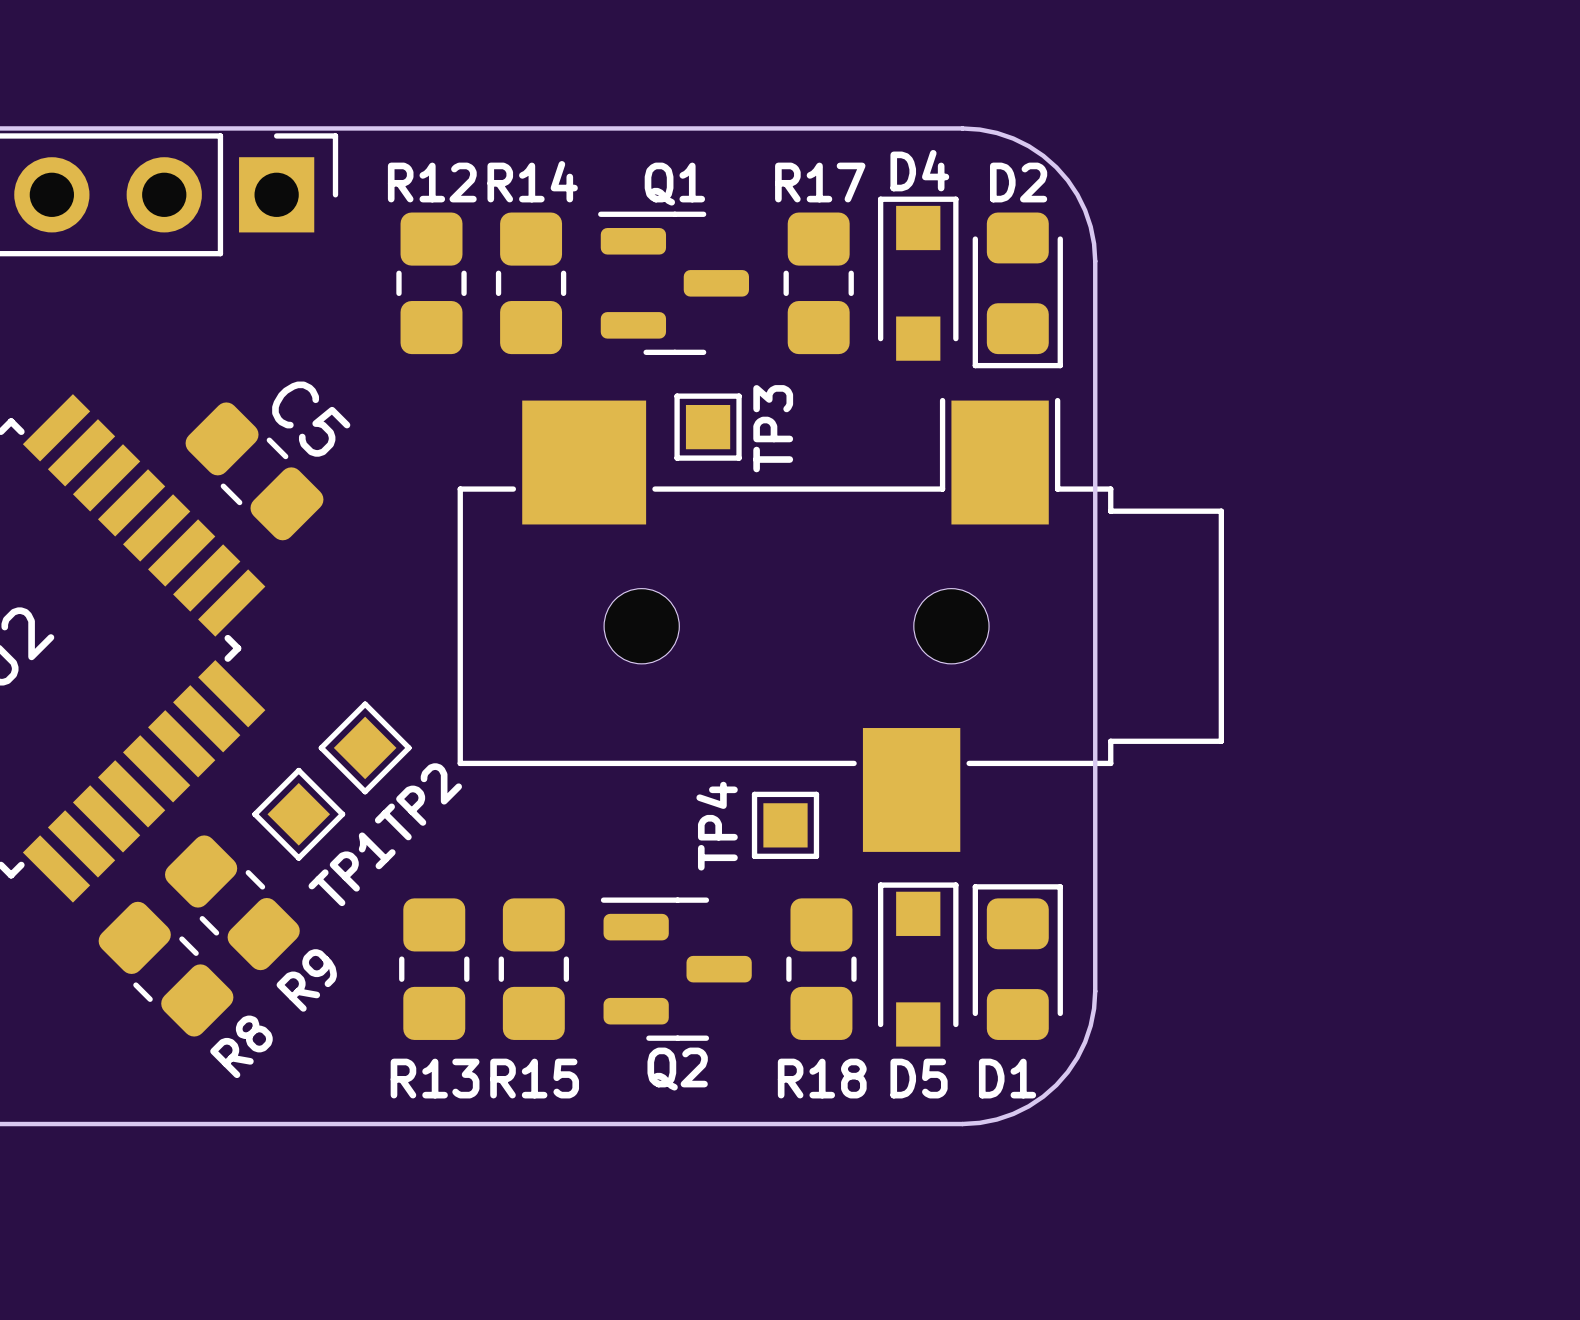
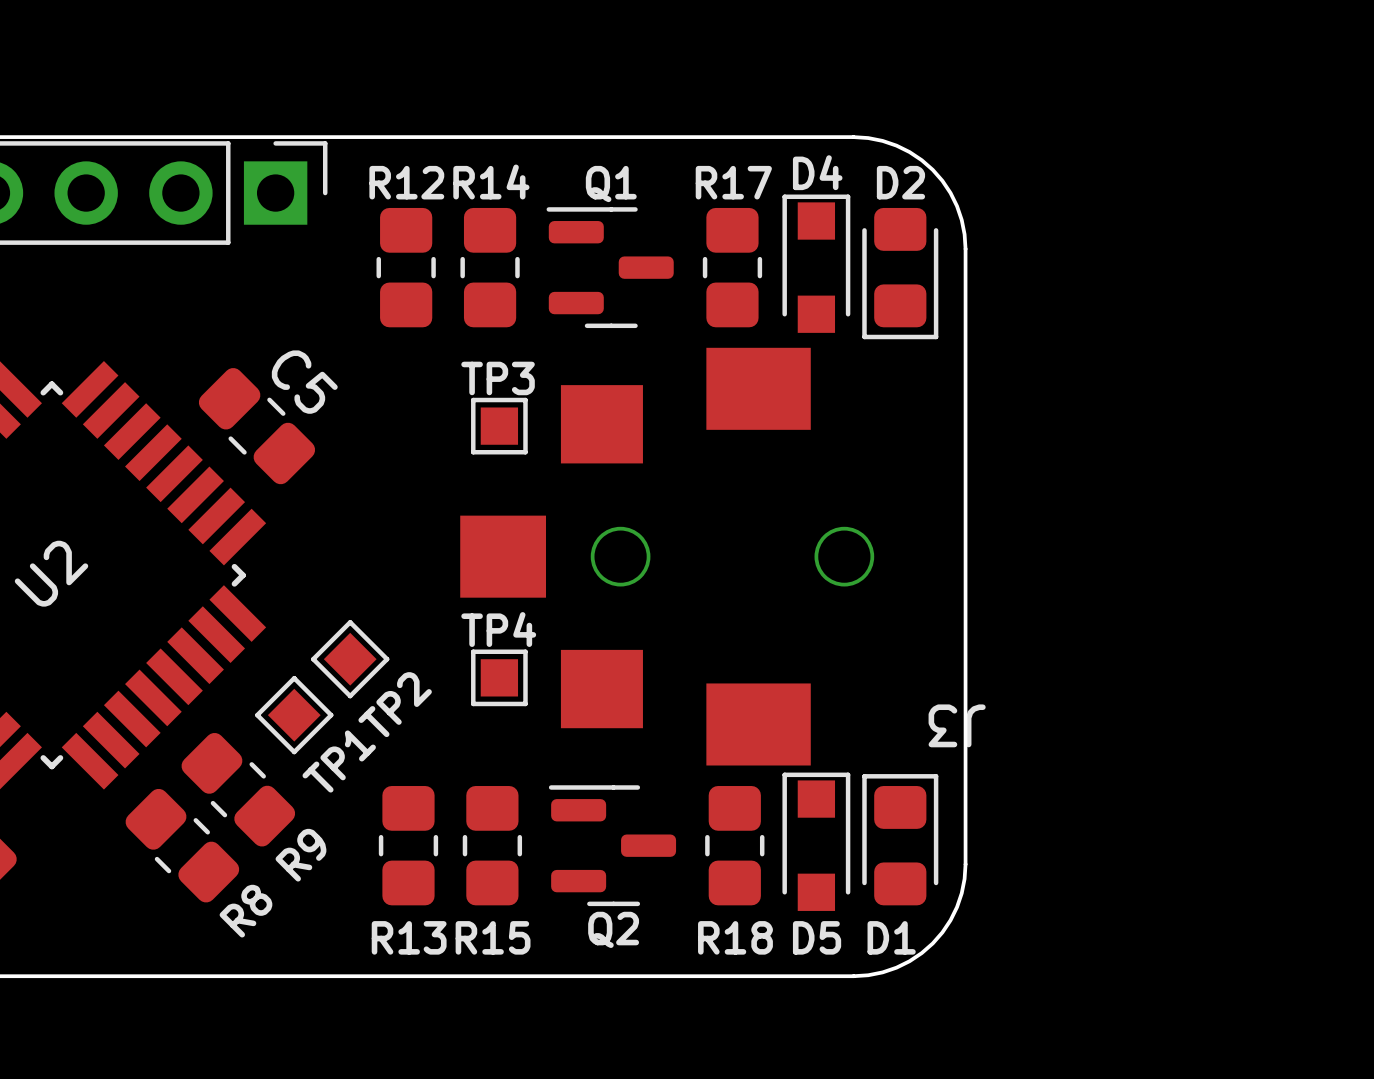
TP3 position: (708, 427) -> (499, 426)
TP3 name rotation: 0° (773, 428) -> 90° clockwise (498, 378)
part: (840, 624) -> none
J3: none -> (667, 556)
TP4 position: (785, 825) -> (499, 677)
TP4 name rotation: 0° (717, 826) -> 90° clockwise (498, 629)

